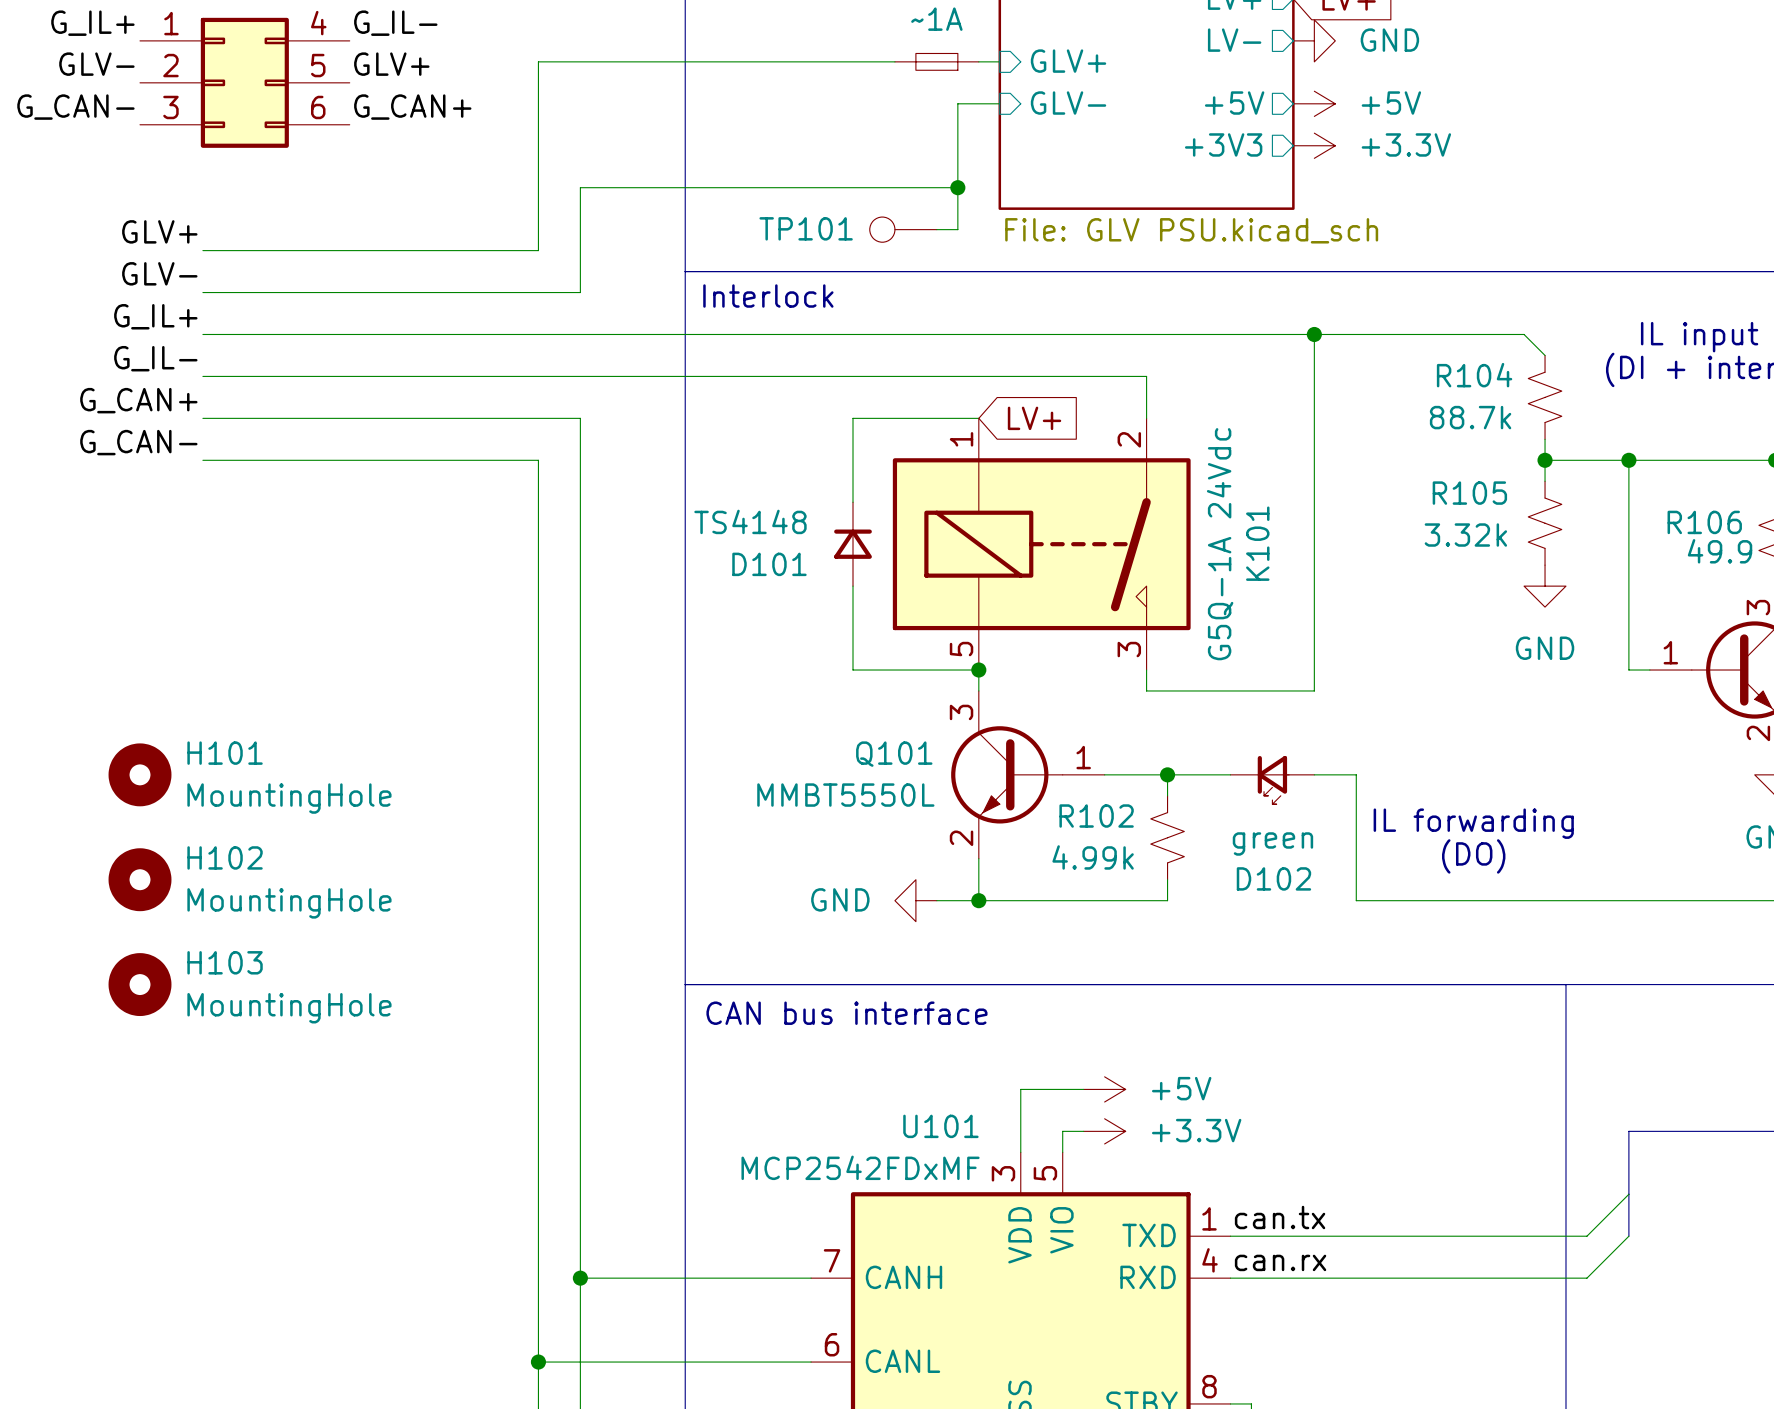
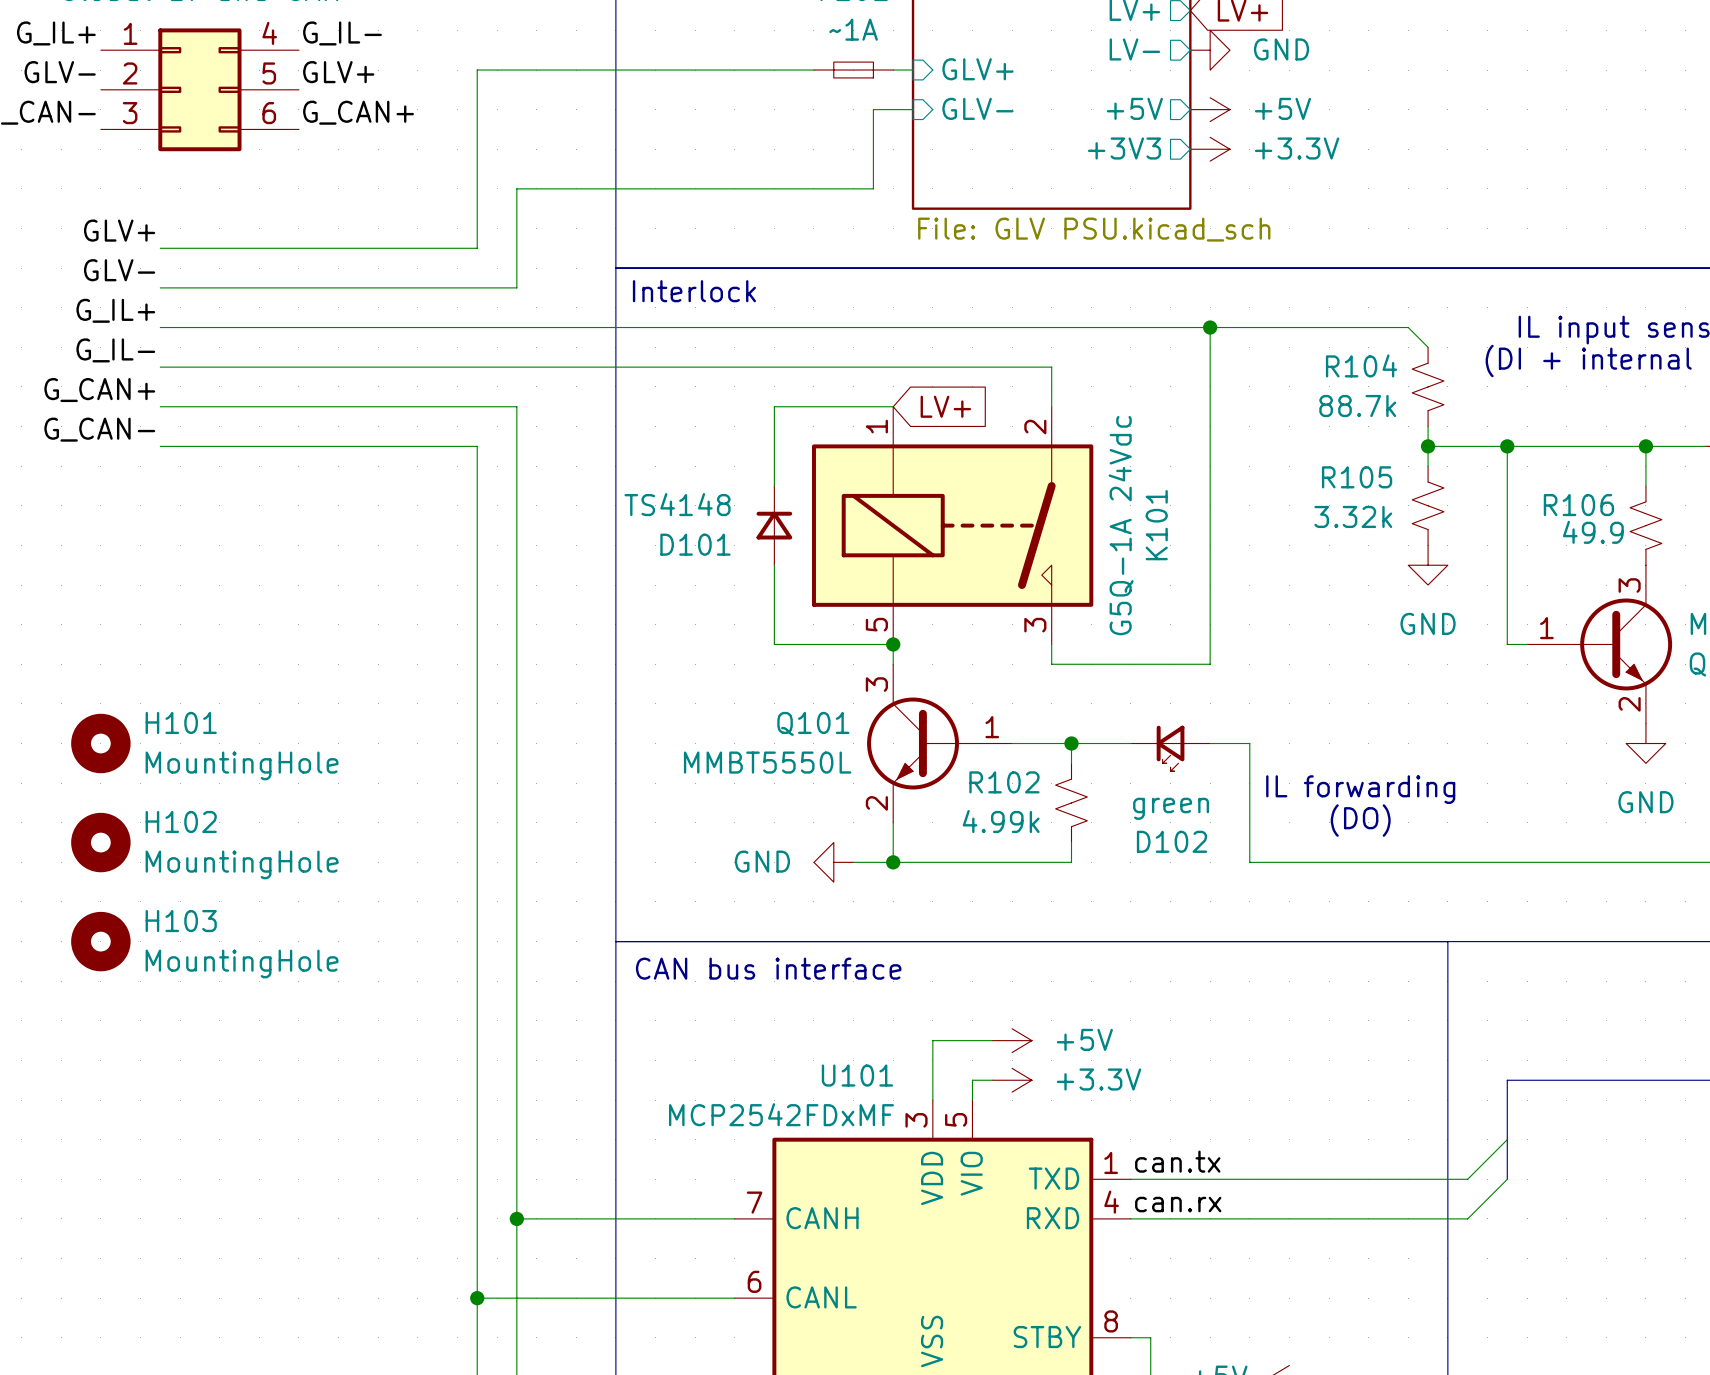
wire: (957, 187) (957, 229) (936, 229) -> none
junction: (957, 187) -> none
TP101: (903, 229) -> none

